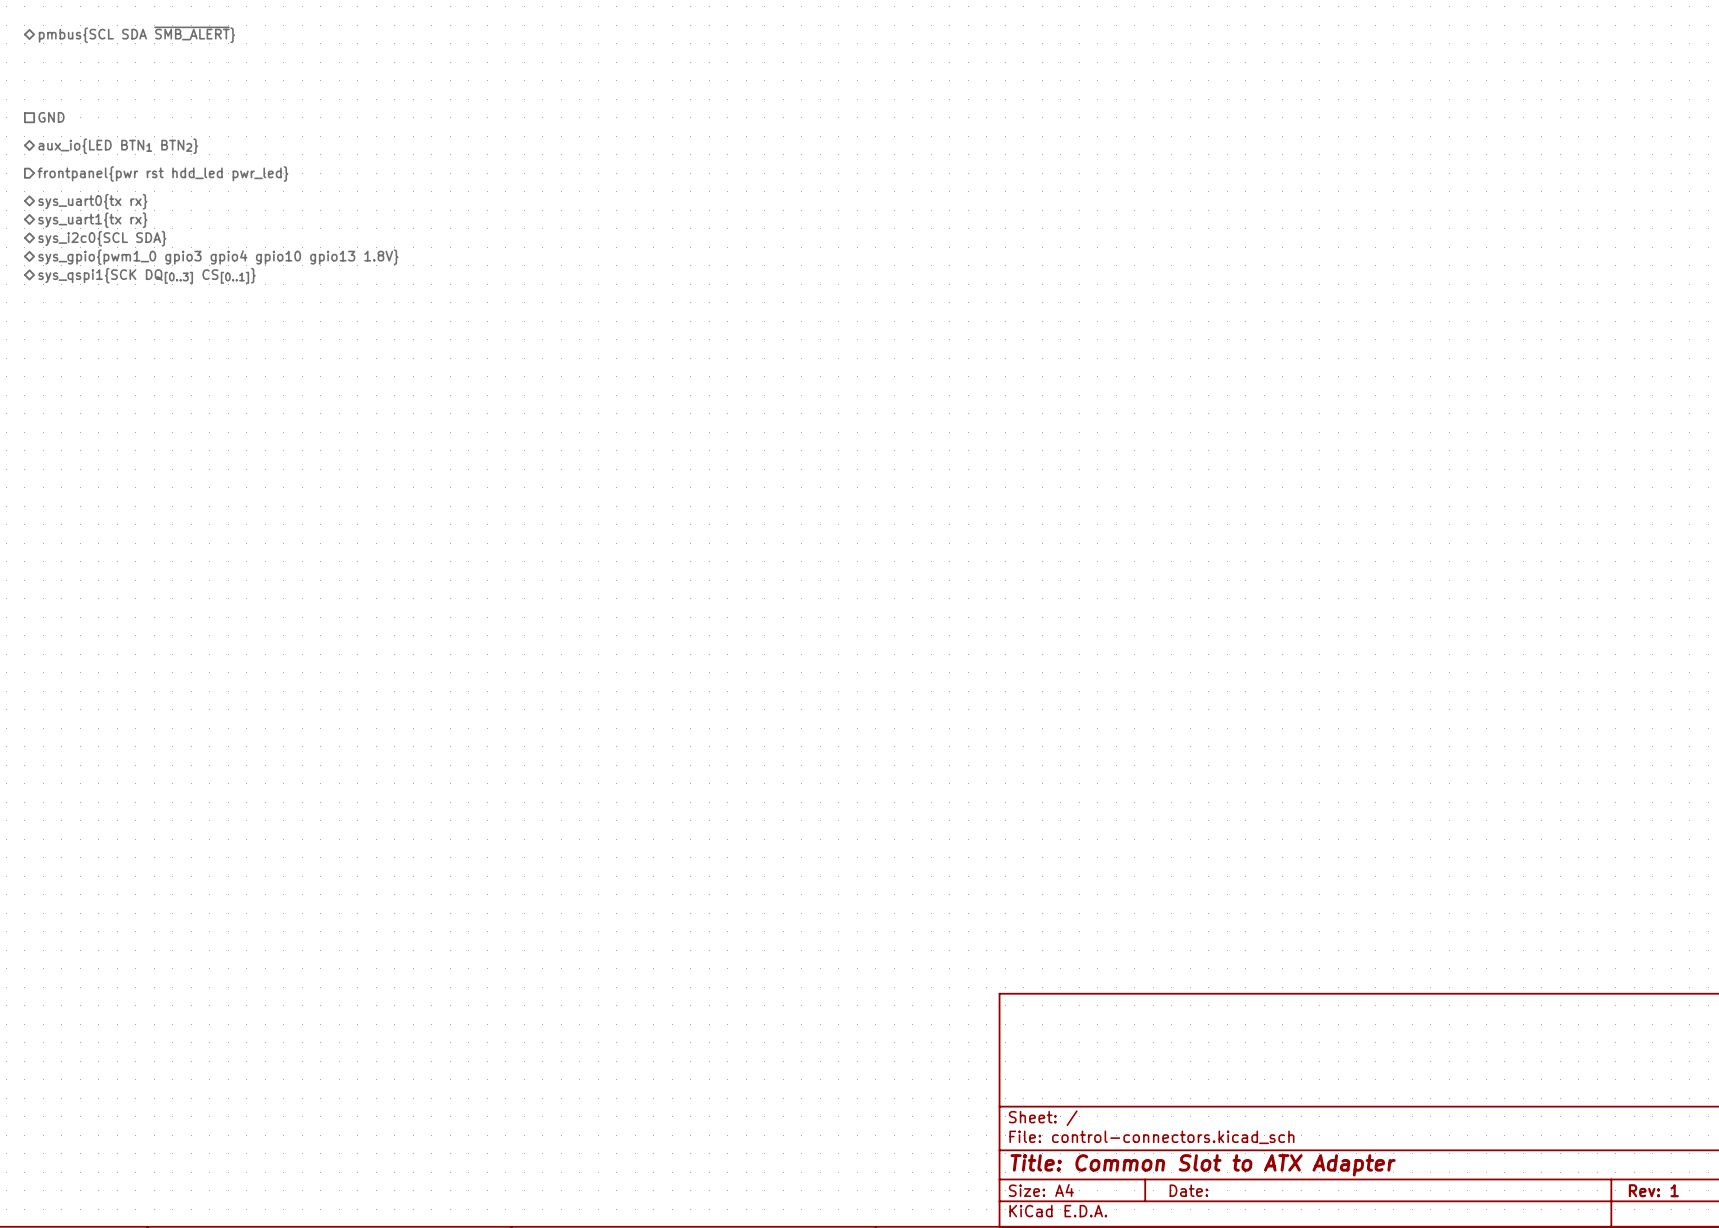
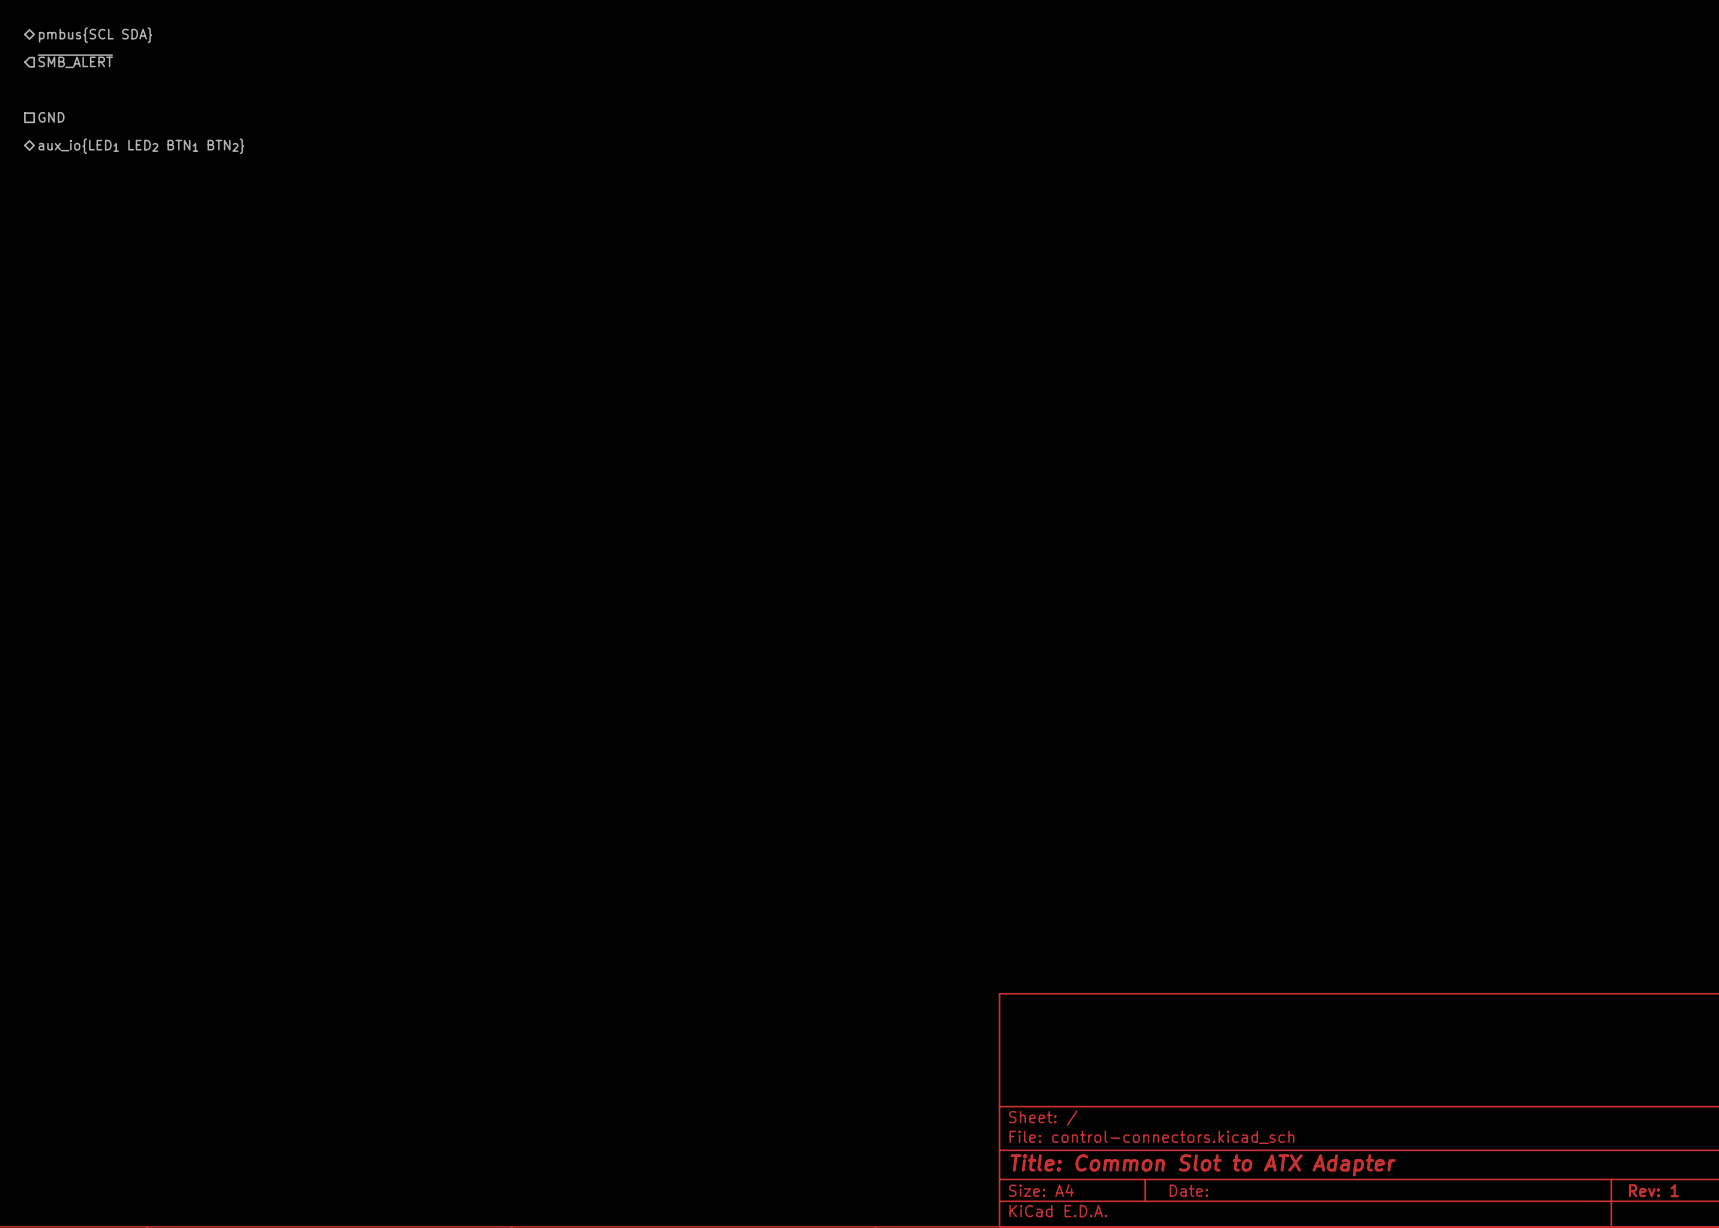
hierarchical label: pmbus{SCL SDA ~{SMB_ALERT}} (136, 34) -> pmbus{SCL SDA} (95, 35)
hierarchical label: none -> ~{SMB_ALERT} (75, 61)
hierarchical label: aux_io{LED BTN1 BTN2} (118, 146) -> aux_io{LED1 LED2 BTN1 BTN2} (141, 146)
hierarchical label: frontpanel{pwr rst hdd_led pwr_led} (162, 173) -> none
hierarchical label: sys_uart0{tx rx} (92, 201) -> none
hierarchical label: sys_uart1{tx rx} (92, 220) -> none
hierarchical label: sys_i2c0{SCL SDA} (102, 238) -> none
hierarchical label: sys_gpio{pwm1_0 gpio3 gpio4 gpio10 gpio13 1.8V} (218, 257) -> none
hierarchical label: sys_qspi1{SCK DQ[0..3] CS[0..1]} (147, 275) -> none

